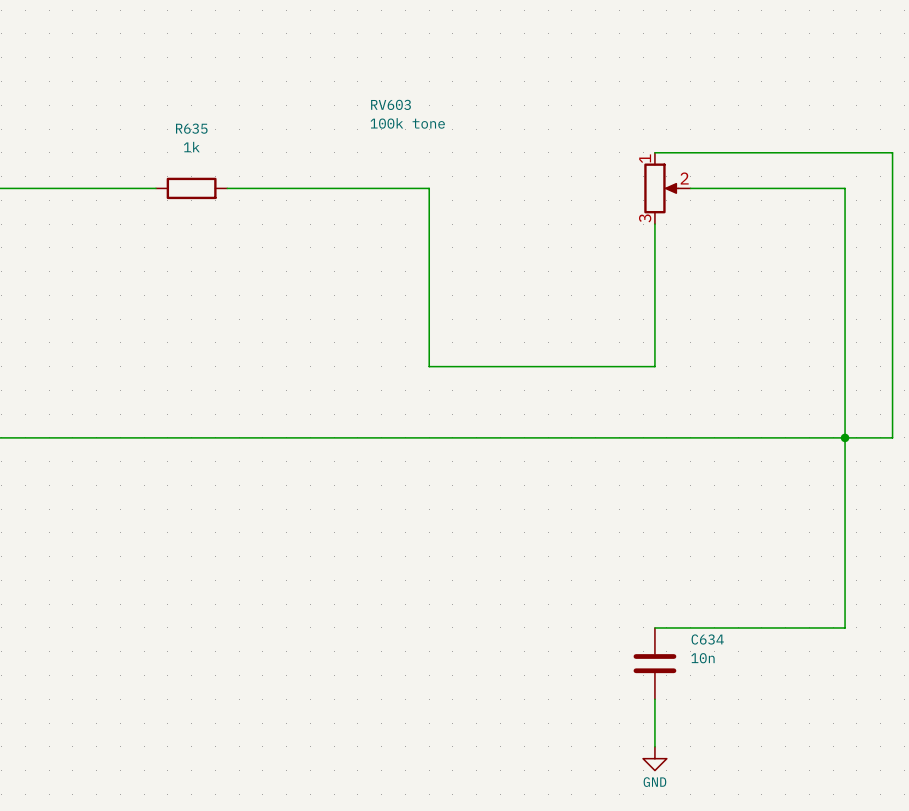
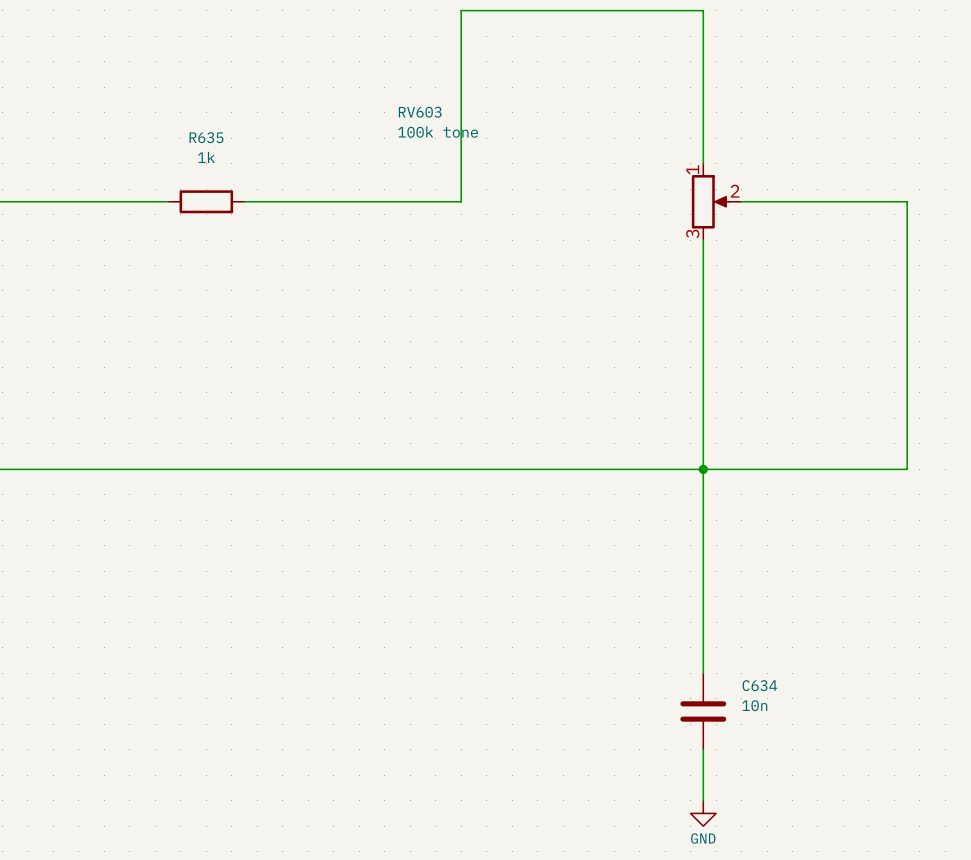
wire: (654, 152) (892, 152) (892, 437) (845, 437) (845, 627) (654, 627) -> (703, 392) (703, 673)
wire: (429, 188) (429, 366) (654, 366) -> (461, 201) (461, 10) (703, 10) (703, 163)
junction: none -> (703, 469)
junction: (845, 437) -> none

